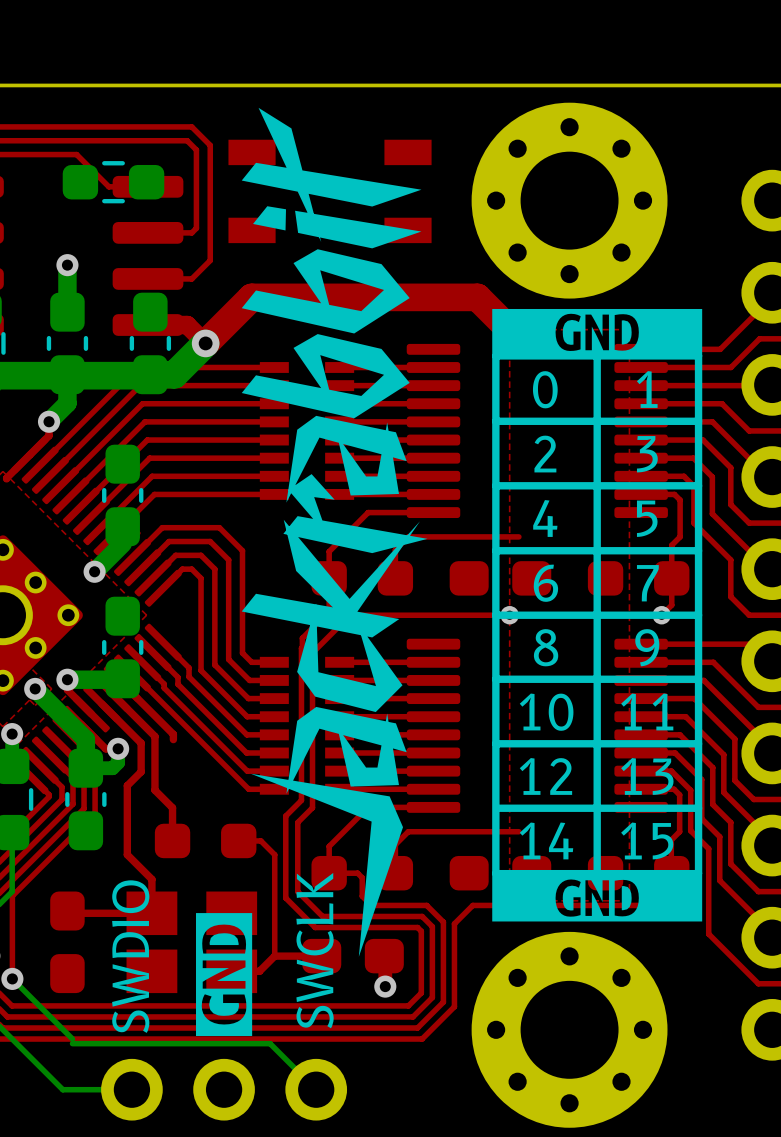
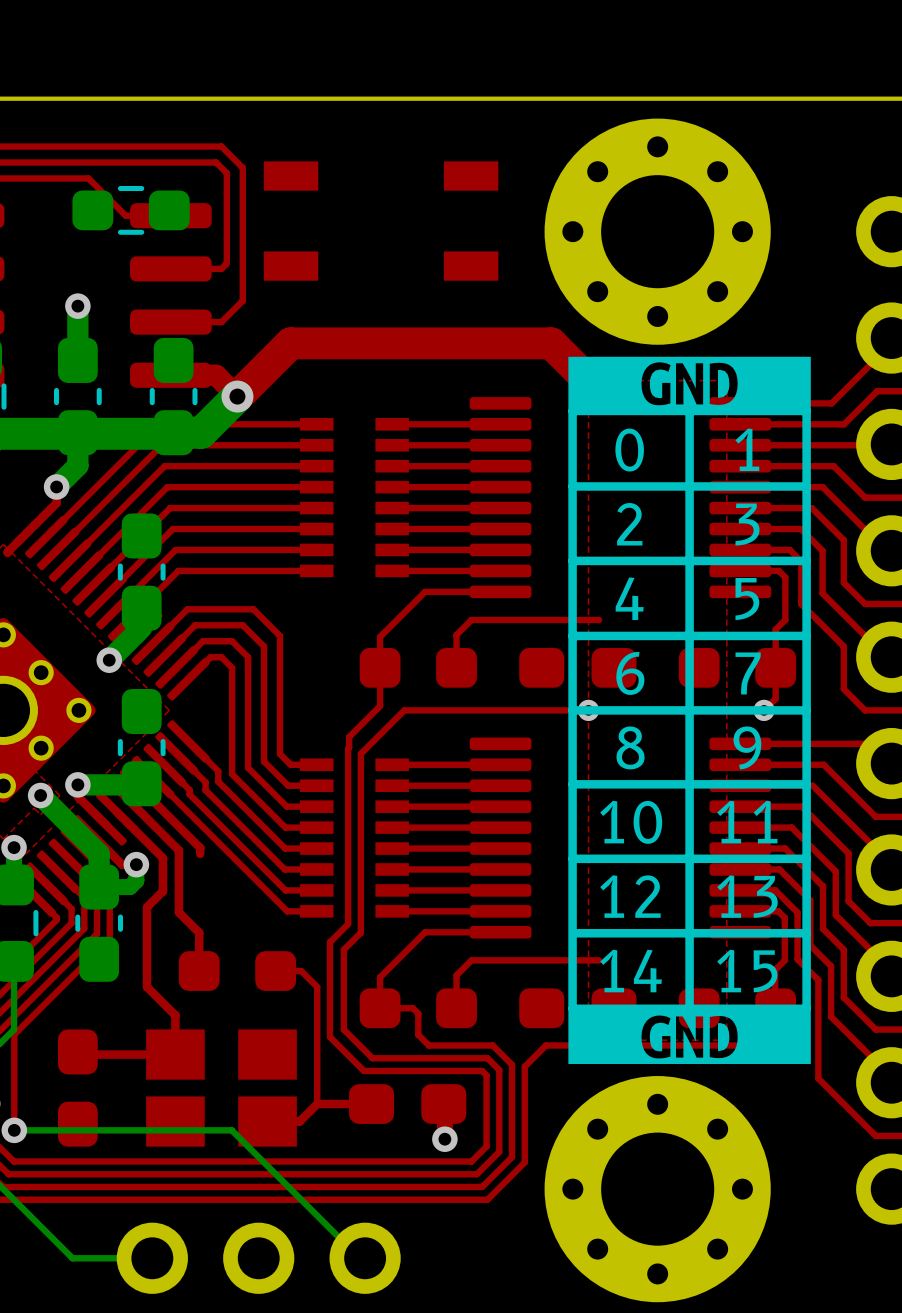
drawing: [195, 107, 428, 1037] -> none
text: SWCLK (315, 950) -> none
text: SWDIO (130, 956) -> none
bottom track: (12, 978) (72, 1039) -> (14, 1130) (231, 1130) (365, 1263)
bottom track: (72, 1043) (270, 1043) (316, 1089) -> none

